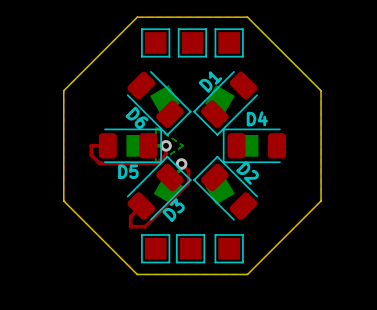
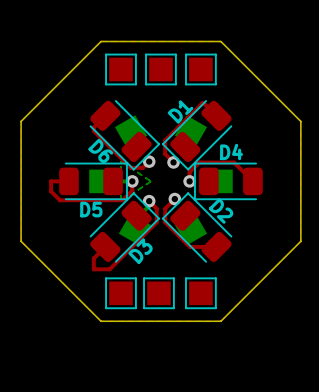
top track: none -> (105, 115) (93, 127) (93, 130) (130, 167) (143, 167) (149, 161)
top track: none -> (216, 115) (202, 103) (165, 140) (165, 154) (173, 162)
via: none -> (149, 161)
via: none -> (173, 162)
top track: none -> (189, 181) (189, 172) (199, 162) (234, 162) (252, 181)
via: none -> (189, 181)
top track: none -> (174, 199) (165, 208) (165, 222) (189, 246) (216, 246)
via: none -> (174, 199)

